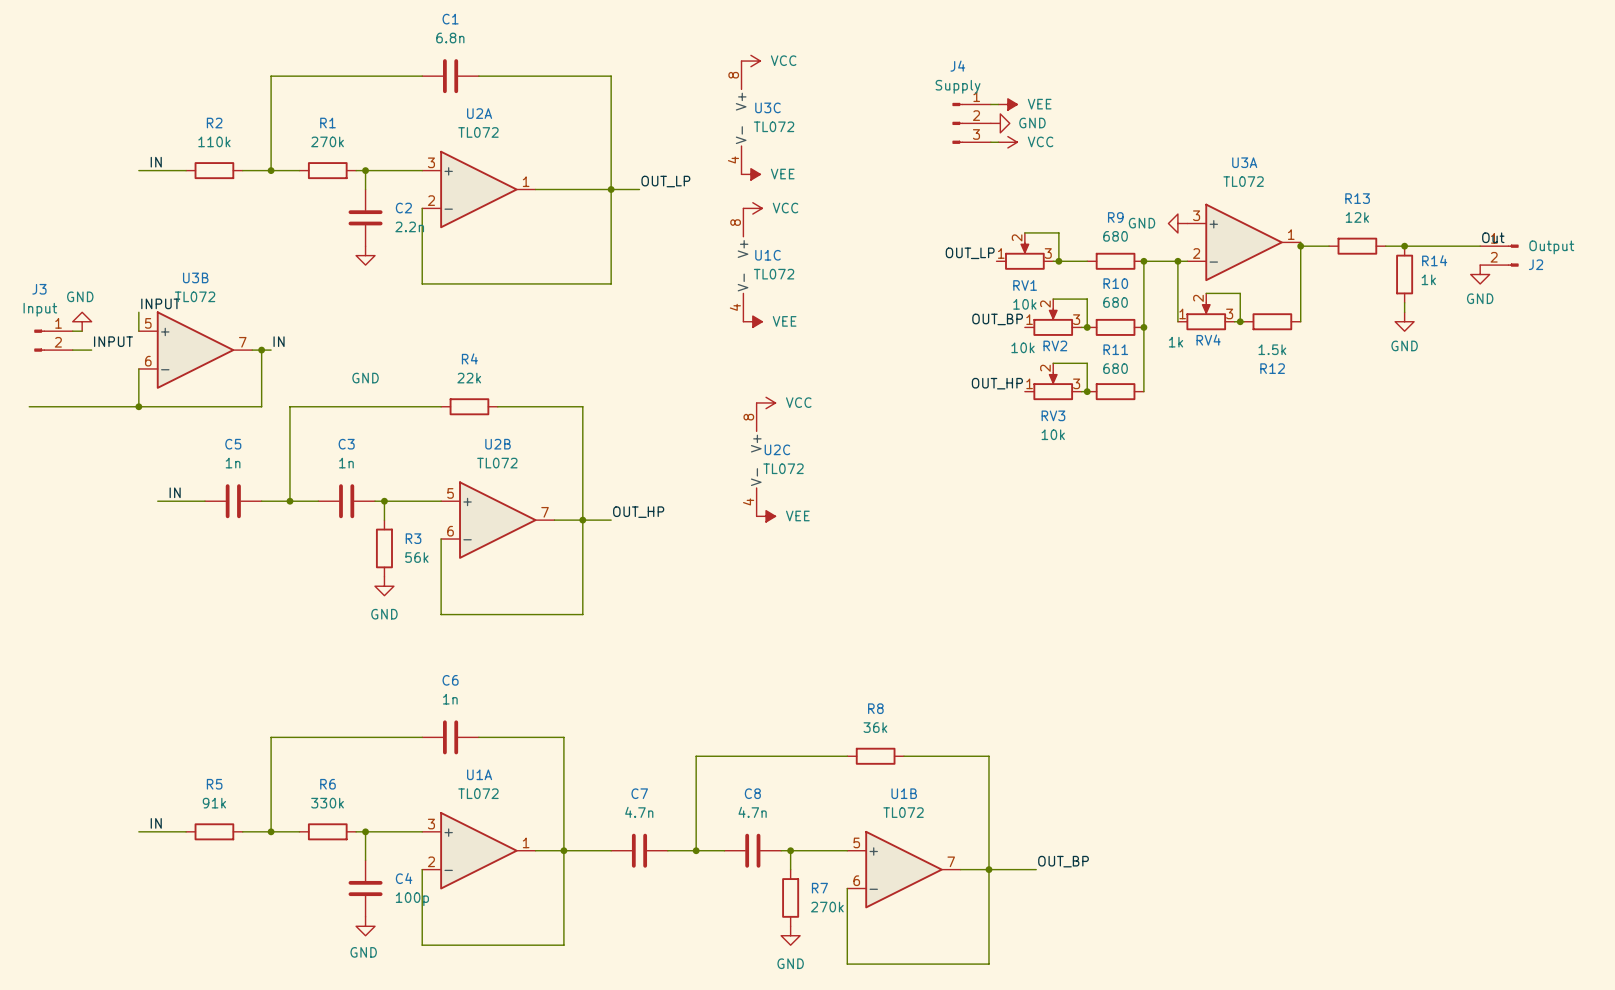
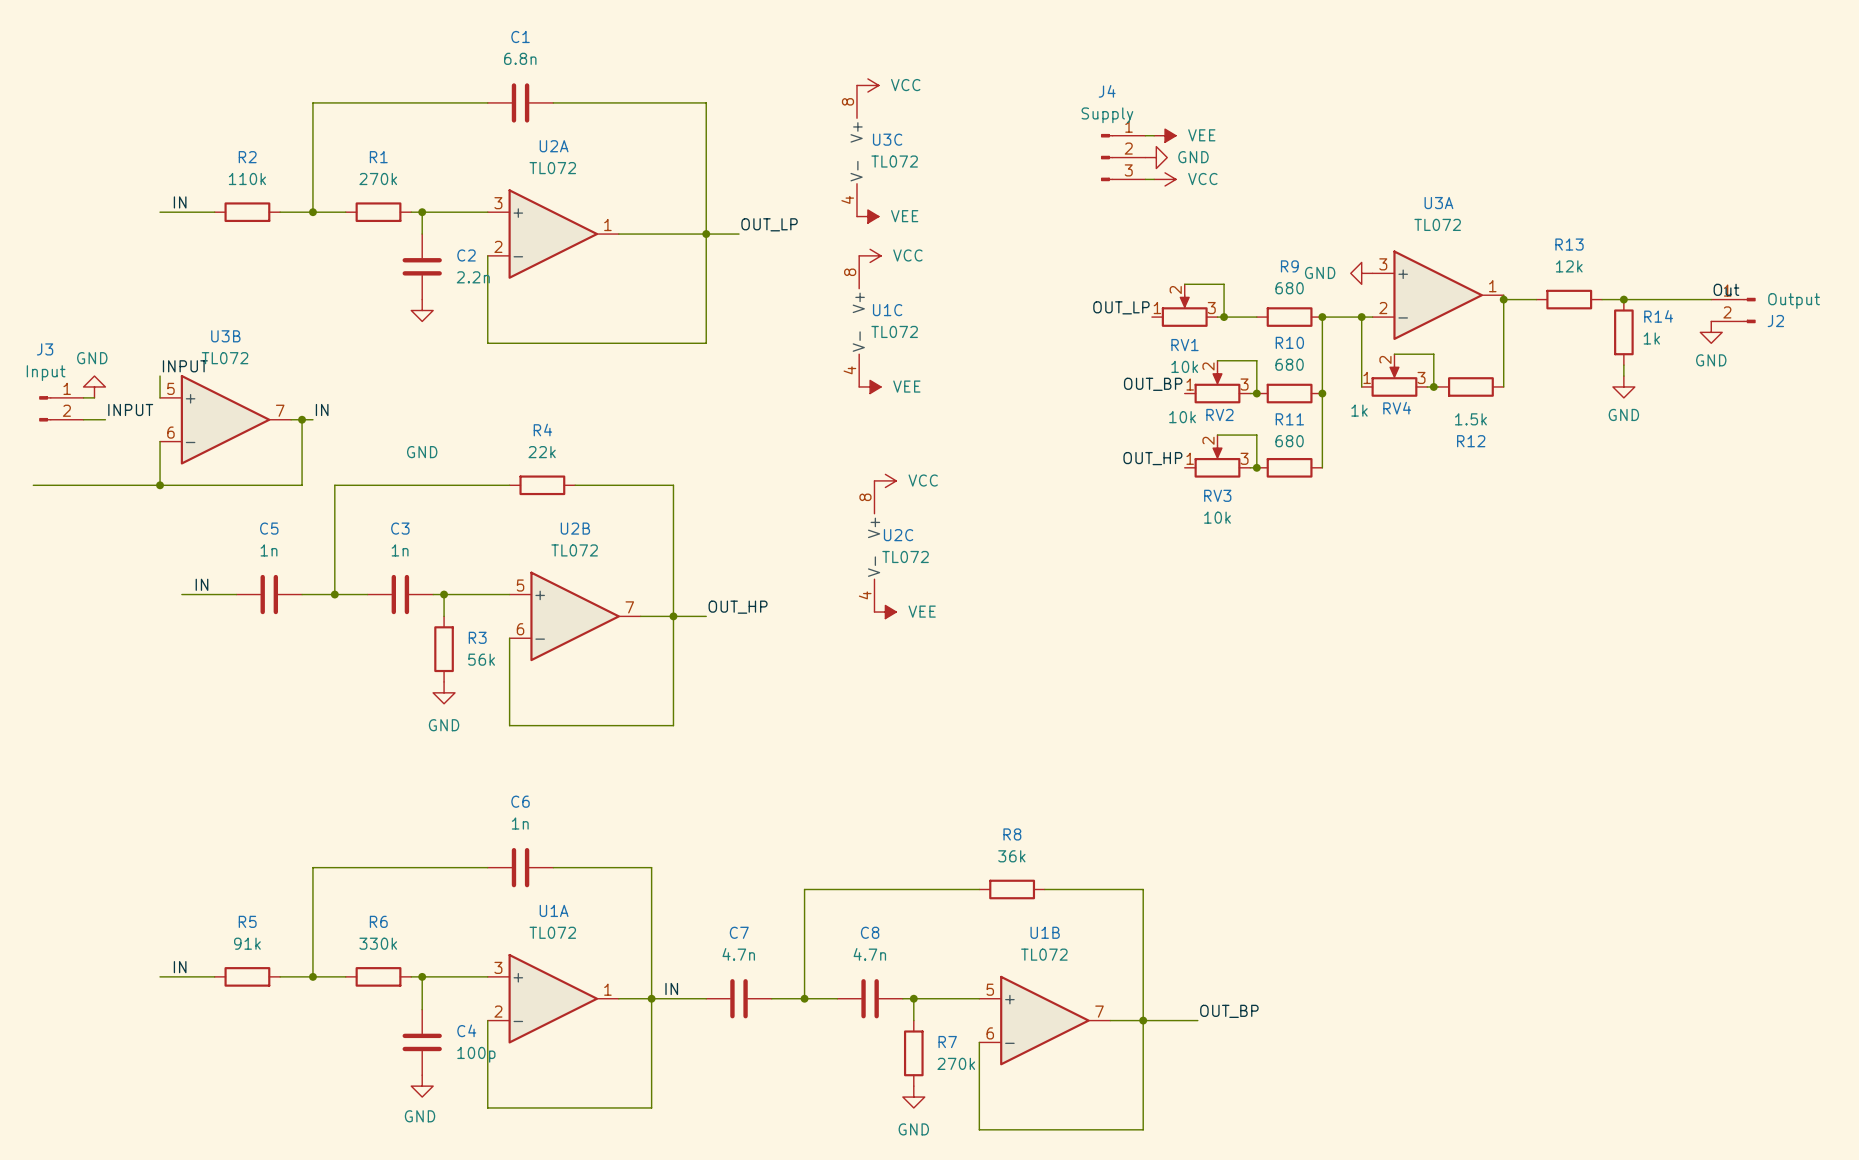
label: none -> IN (671, 988)

